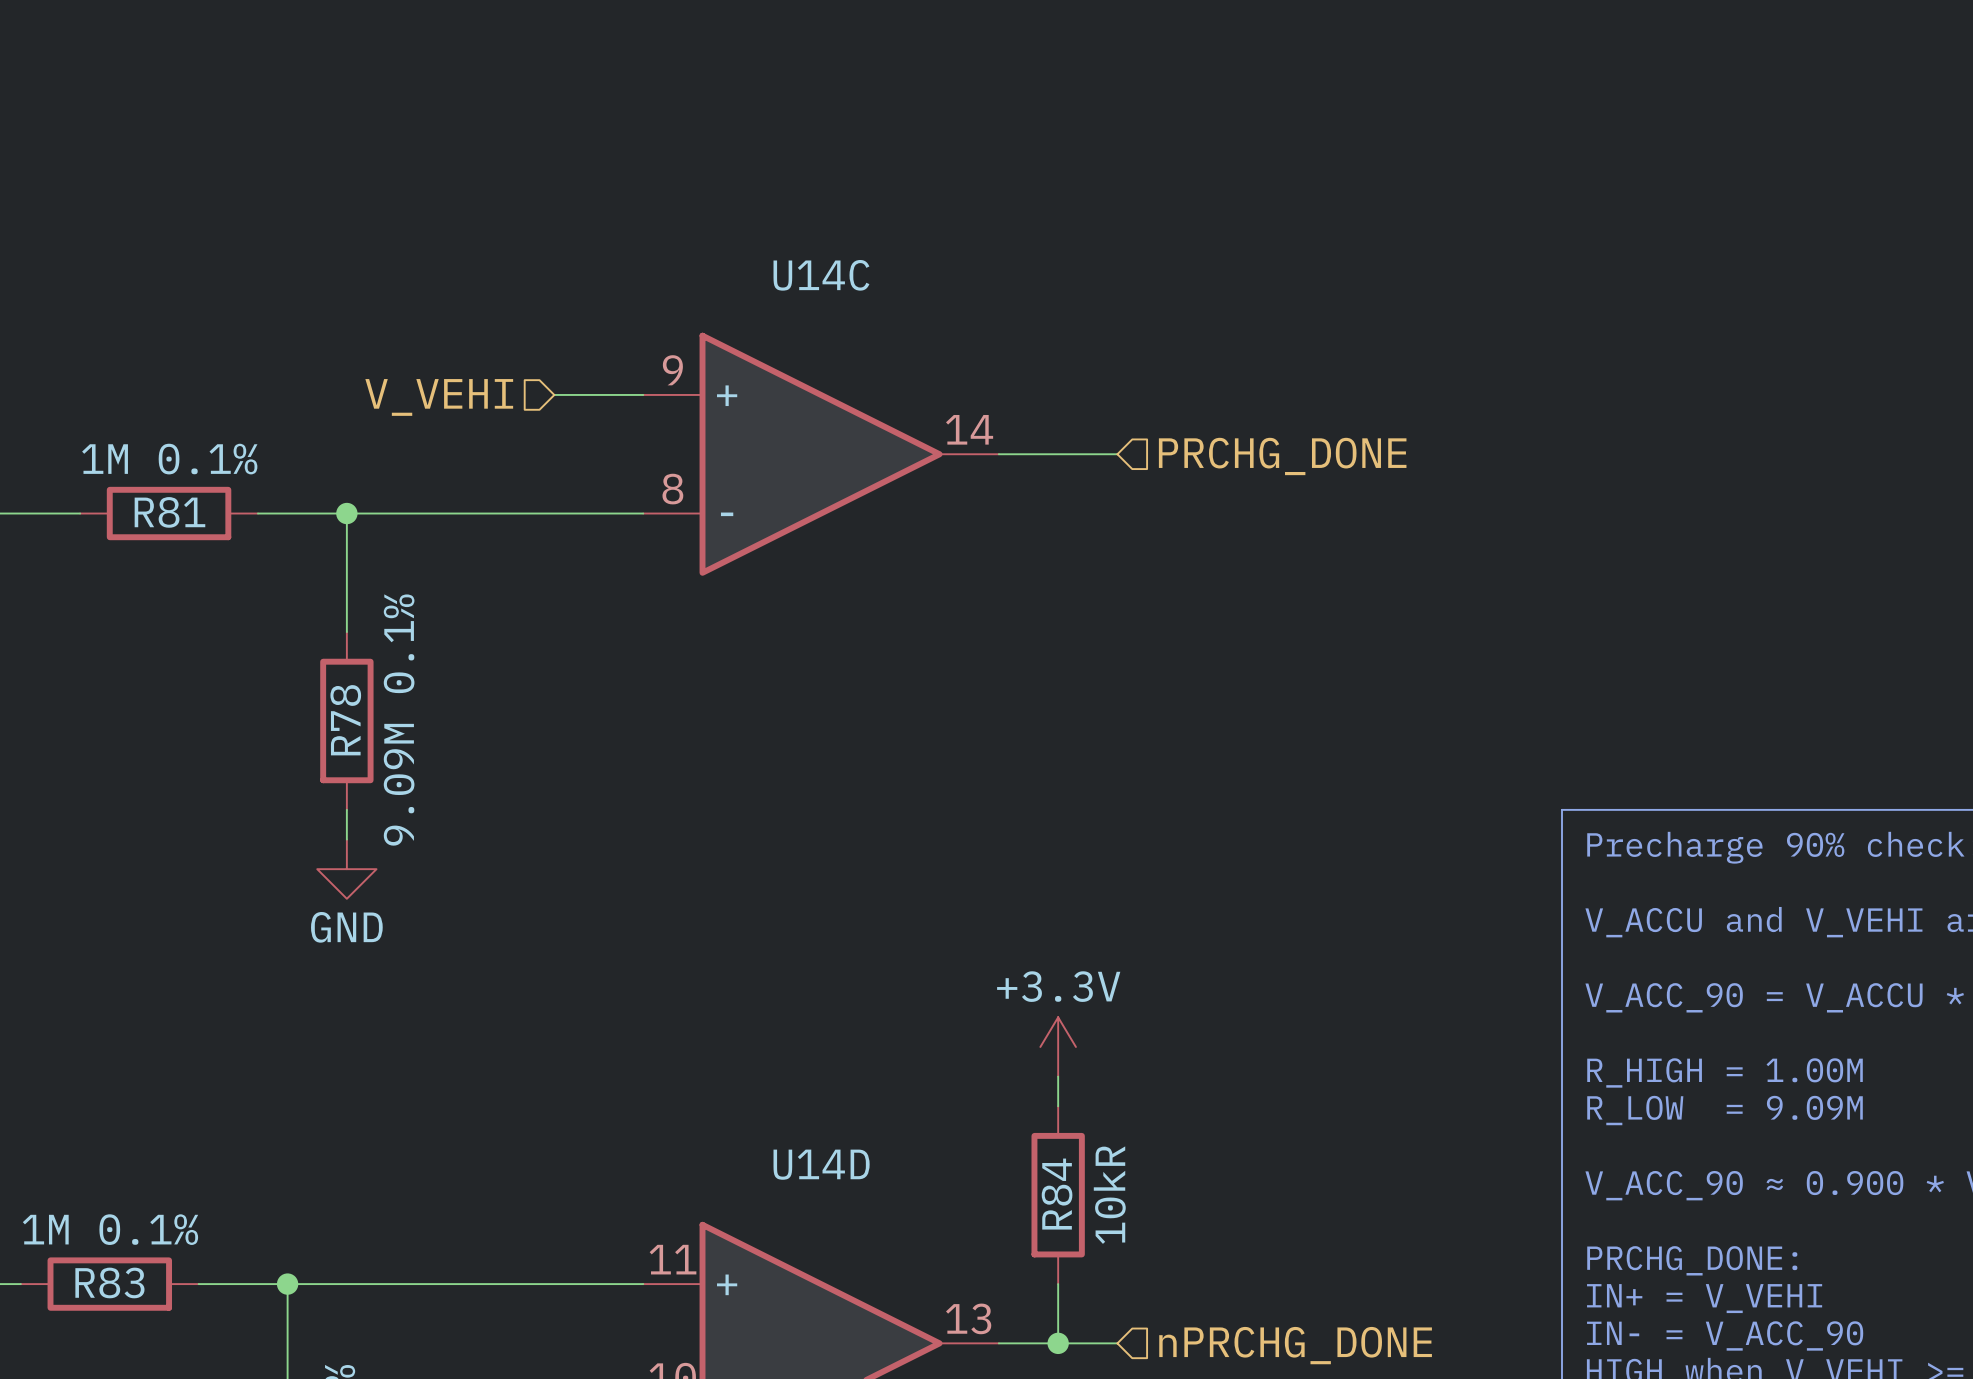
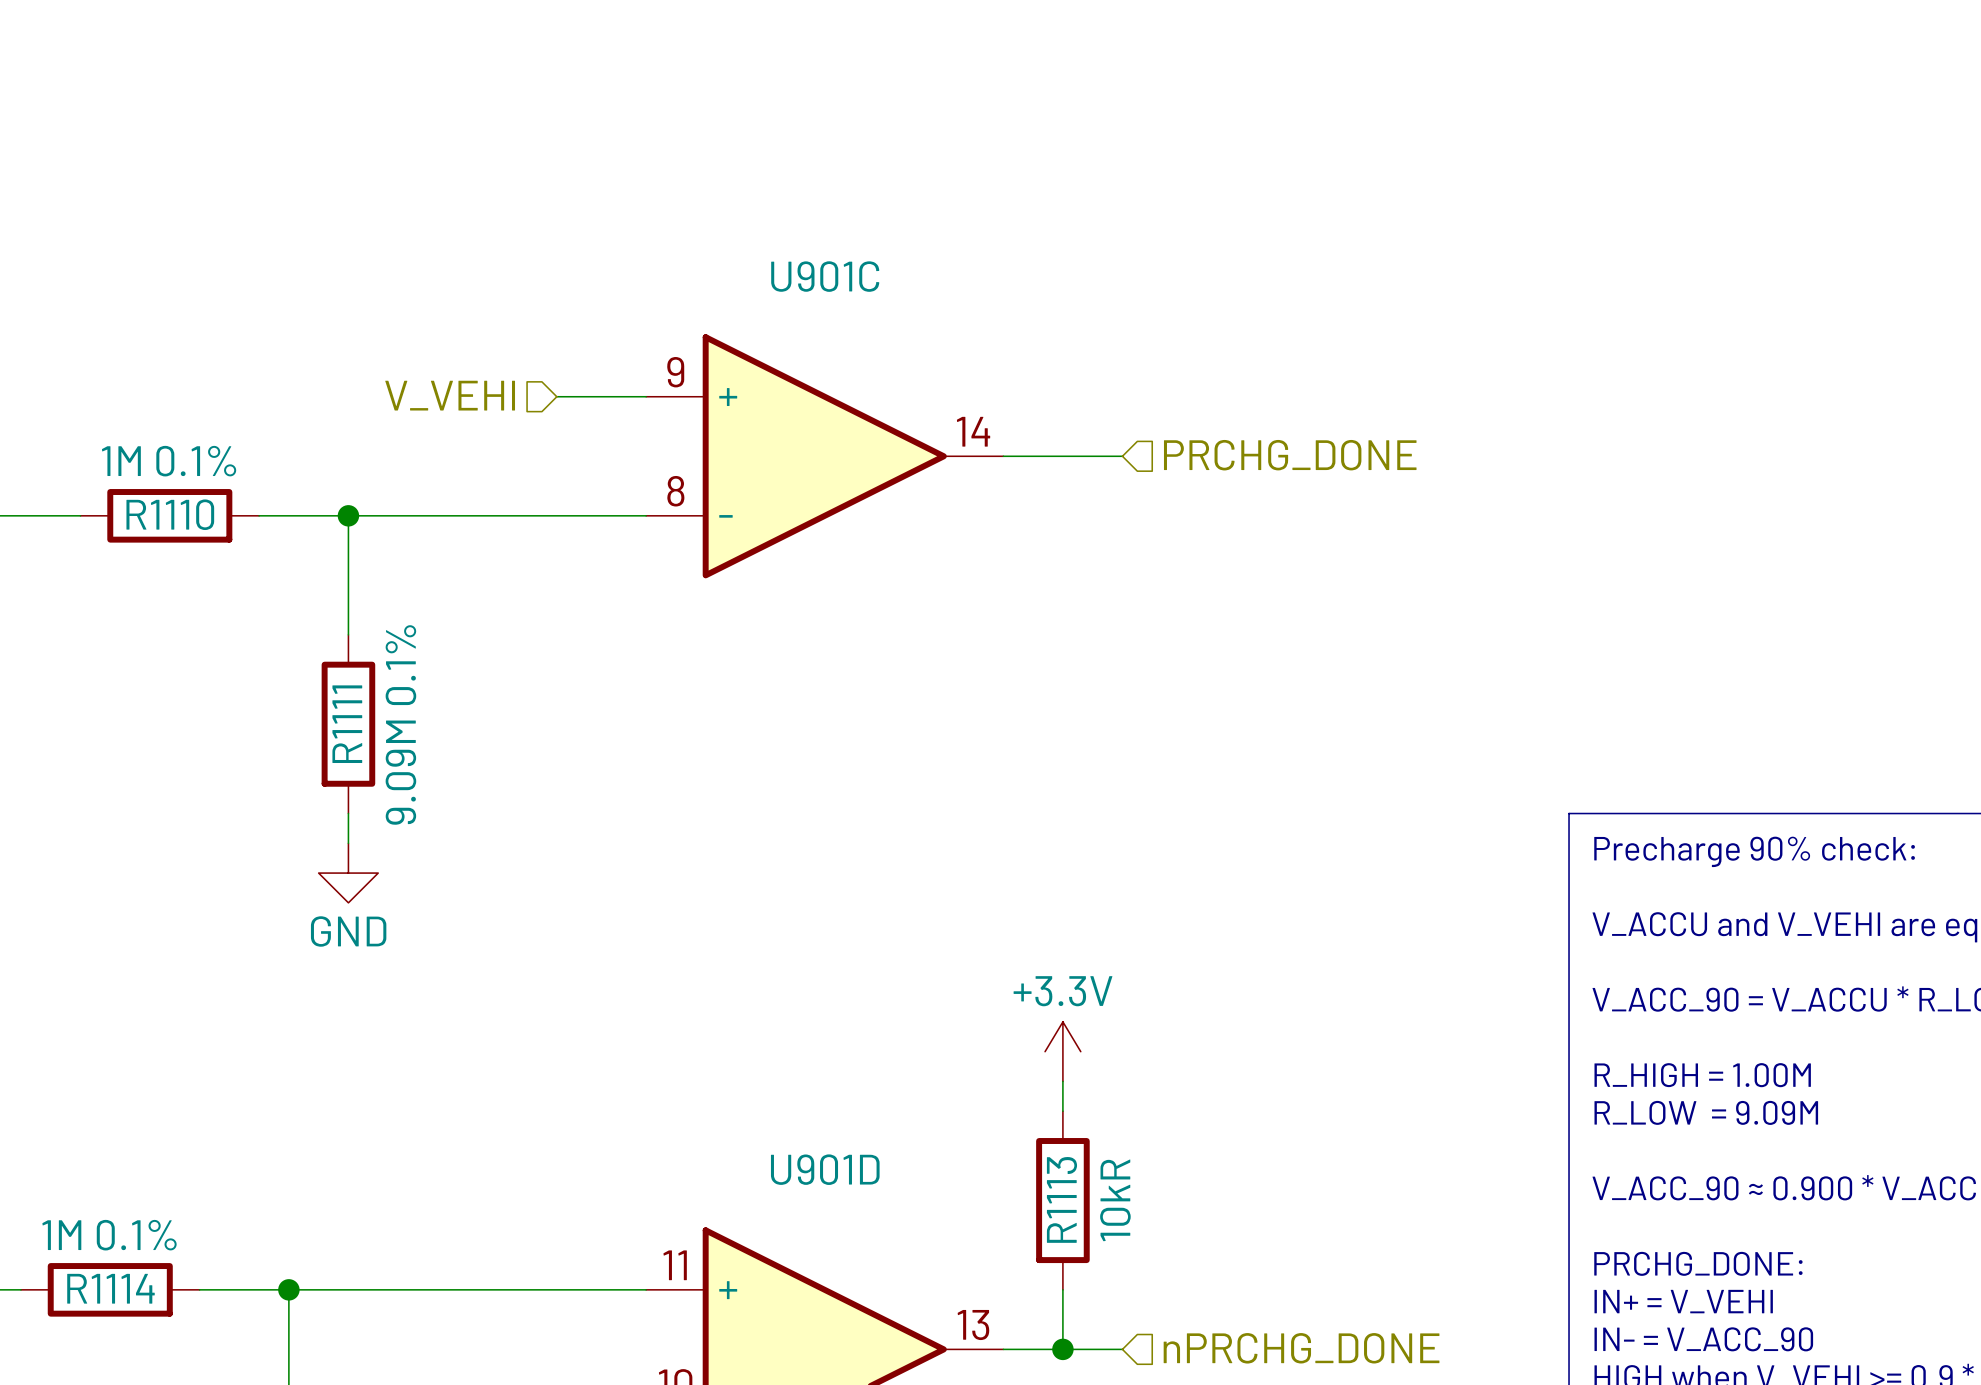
U14C name: U14C (821, 275) -> U901C (825, 276)
R81 name: R81 (169, 512) -> R1110 (170, 514)
R78 name: R78 (345, 720) -> R1111 (347, 724)
U14D name: U14D (821, 1164) -> U901D (825, 1169)
R84 name: R84 (1057, 1194) -> R1113 (1061, 1199)
R83 name: R83 (109, 1282) -> R1114 (110, 1288)

